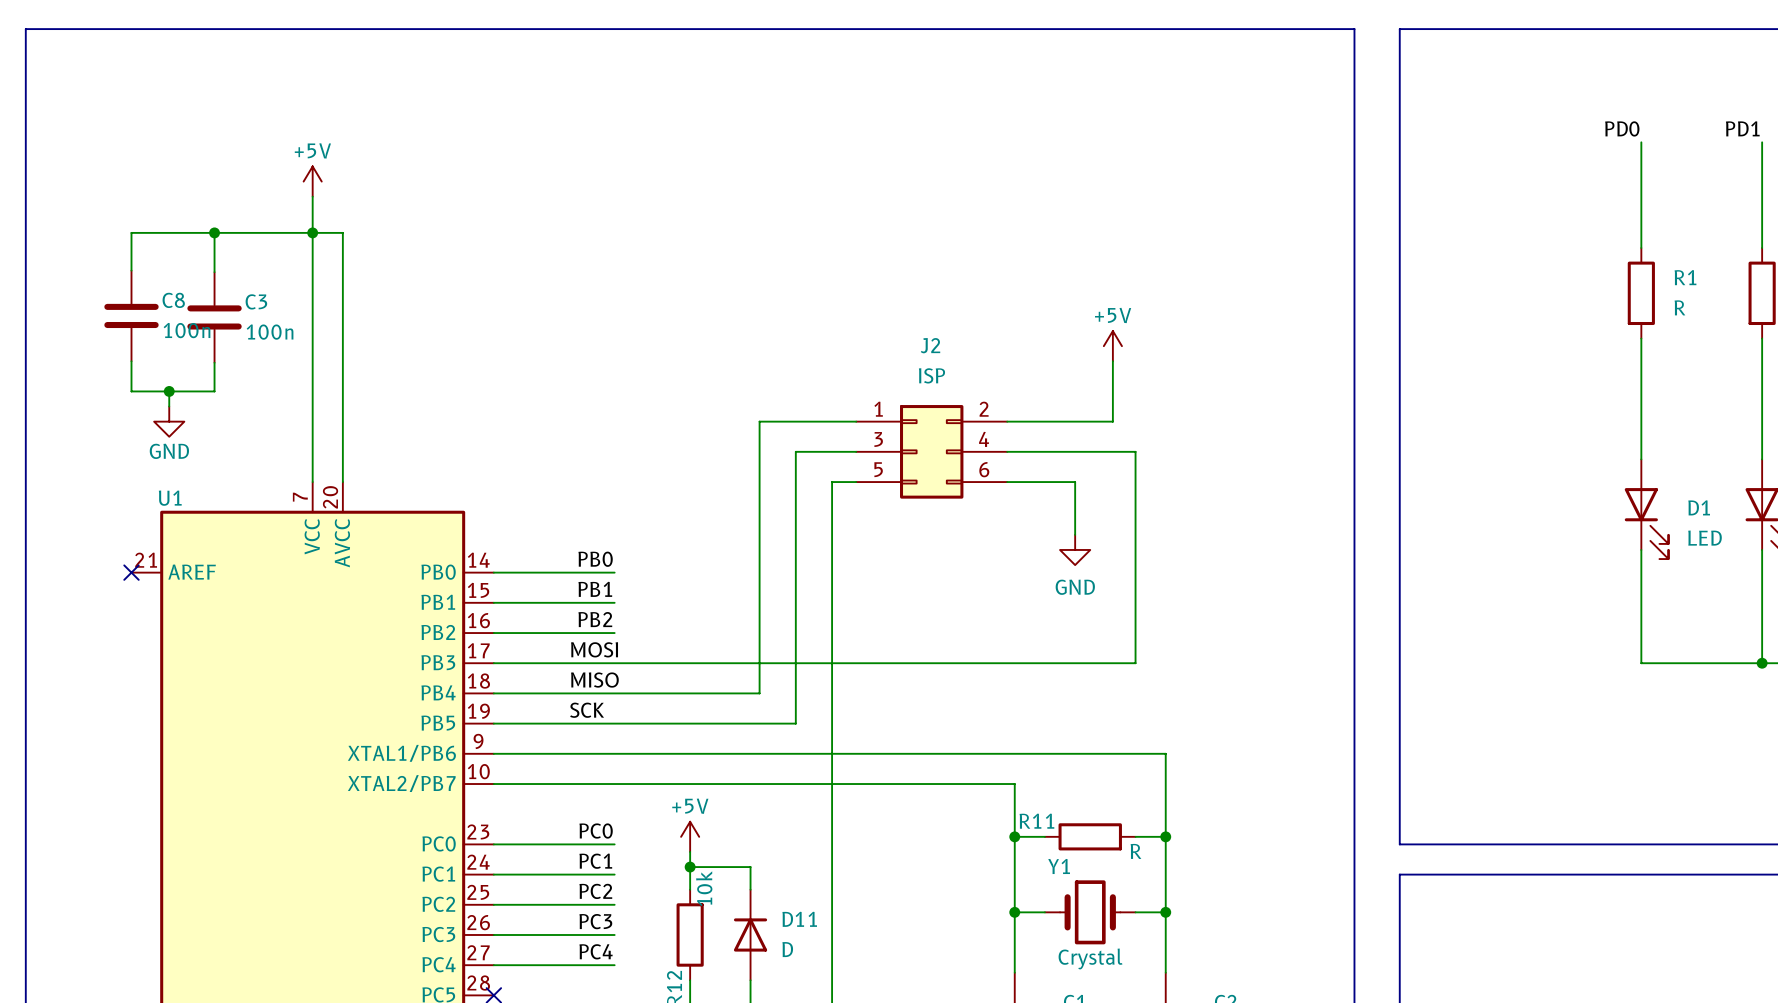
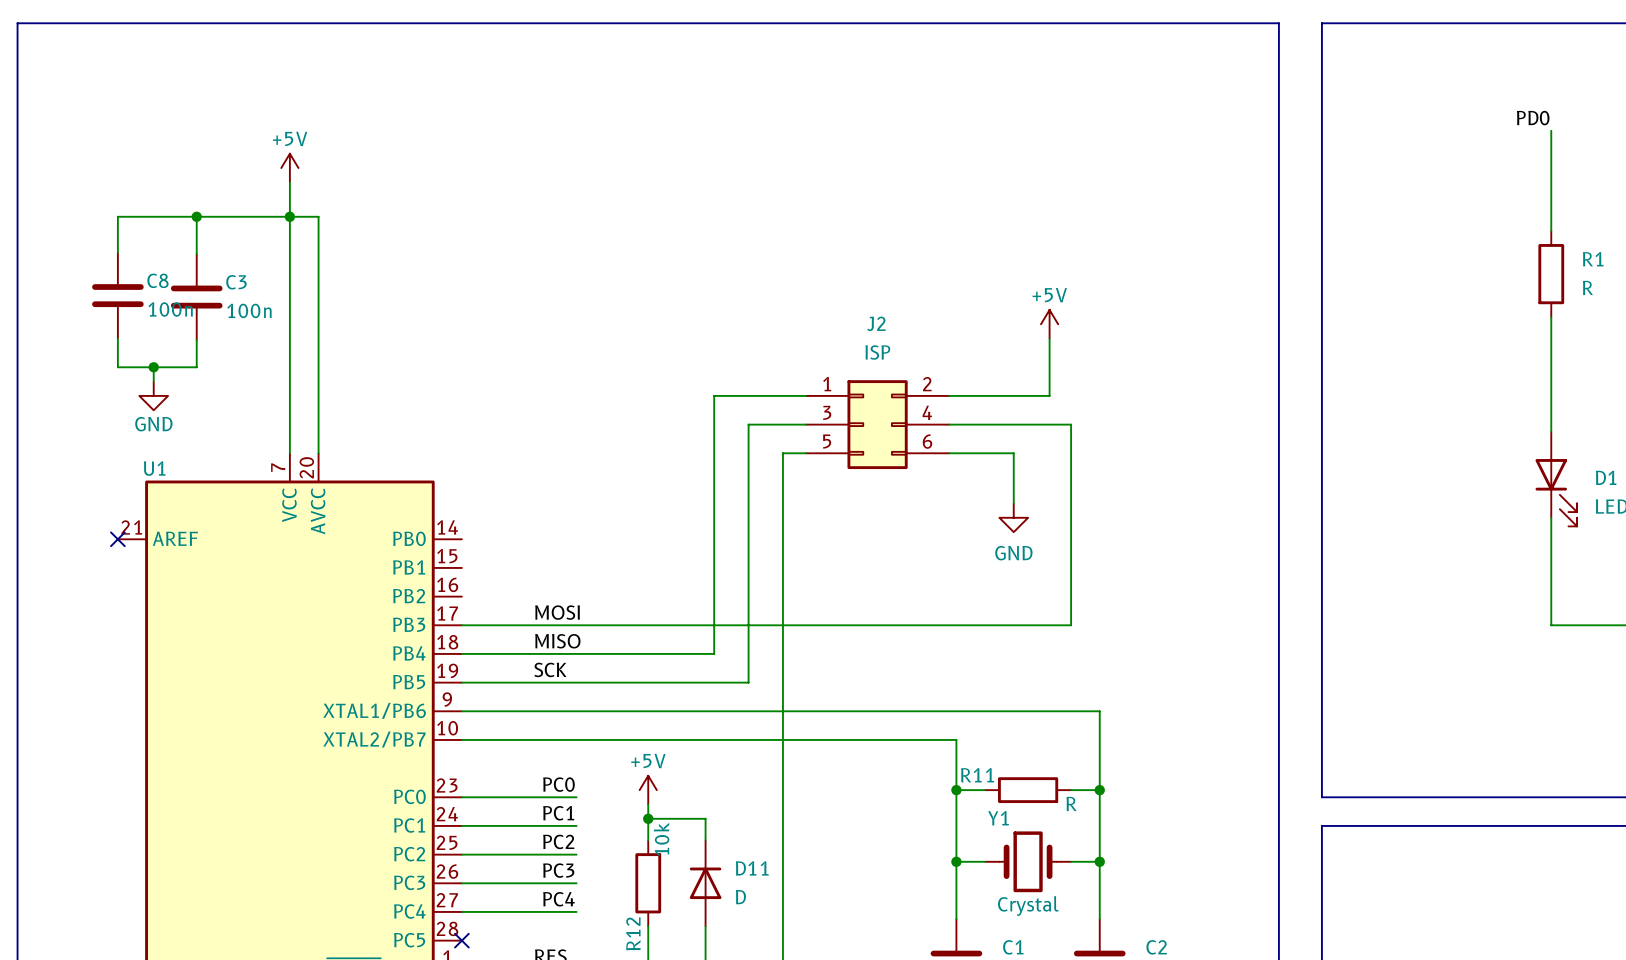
label: PB0 (595, 559) -> none
wire: (493, 572) (614, 572) -> none
label: PB1 (595, 589) -> none
wire: (493, 602) (614, 602) -> none
label: PB2 (595, 619) -> none
wire: (493, 633) (614, 633) -> none

